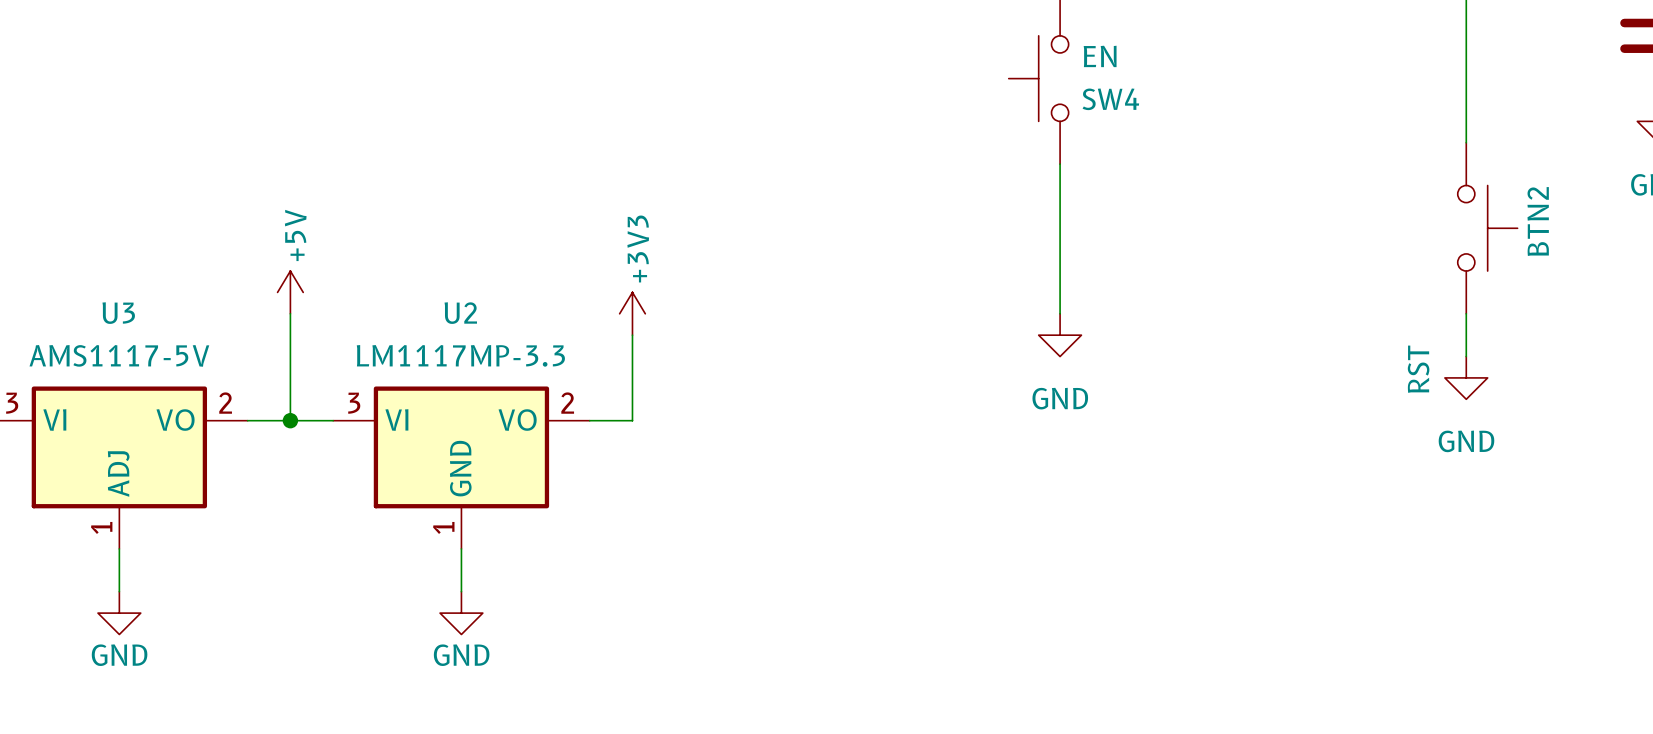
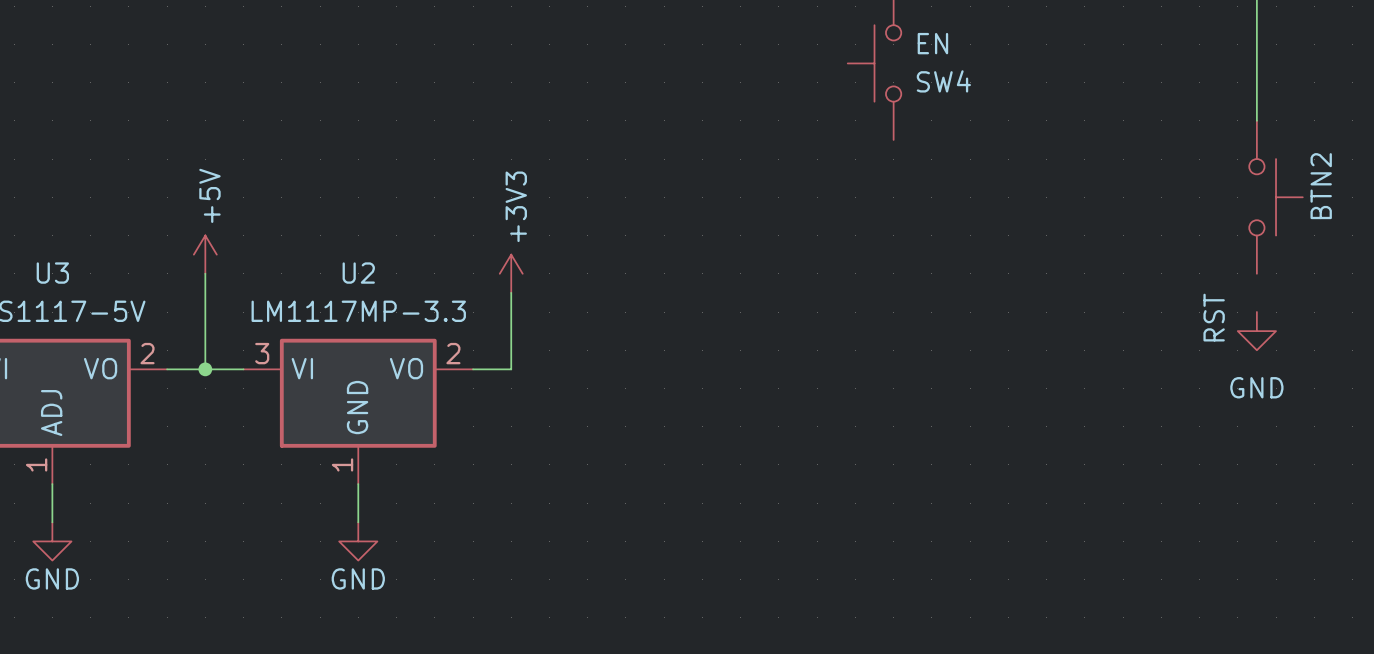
wire: (1060, 164) (1060, 313) -> none
wire: (1466, 313) (1466, 356) -> none
power symbol: GND (1060, 335) -> none

